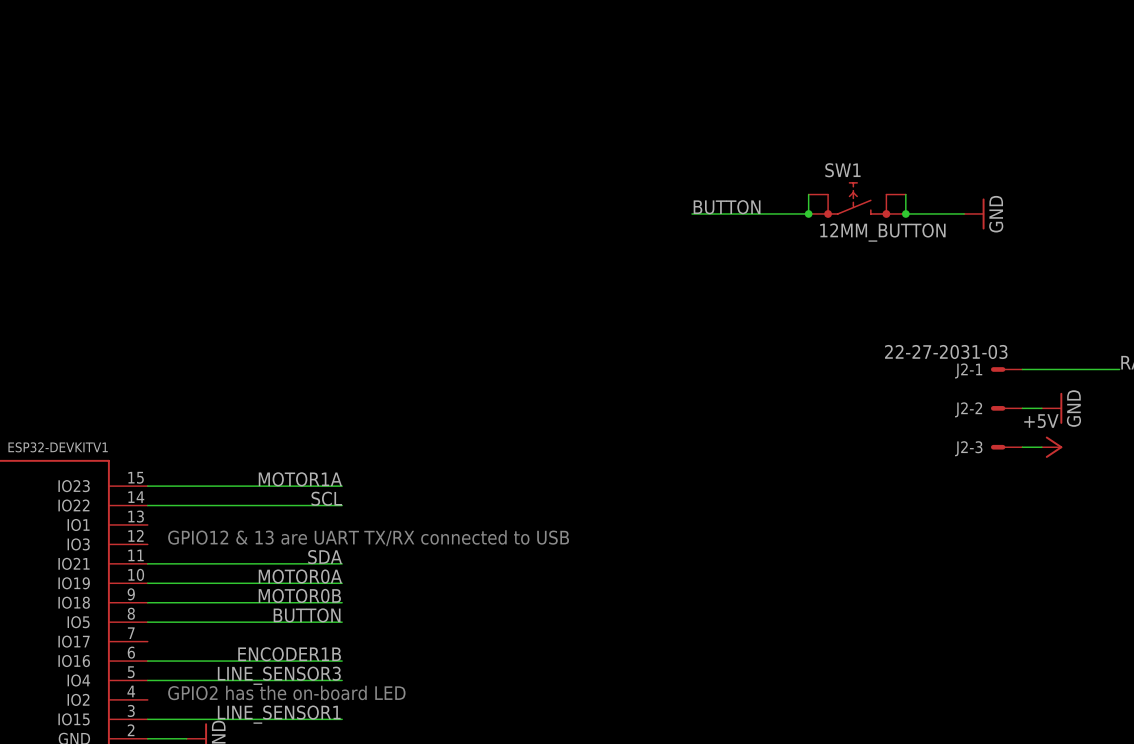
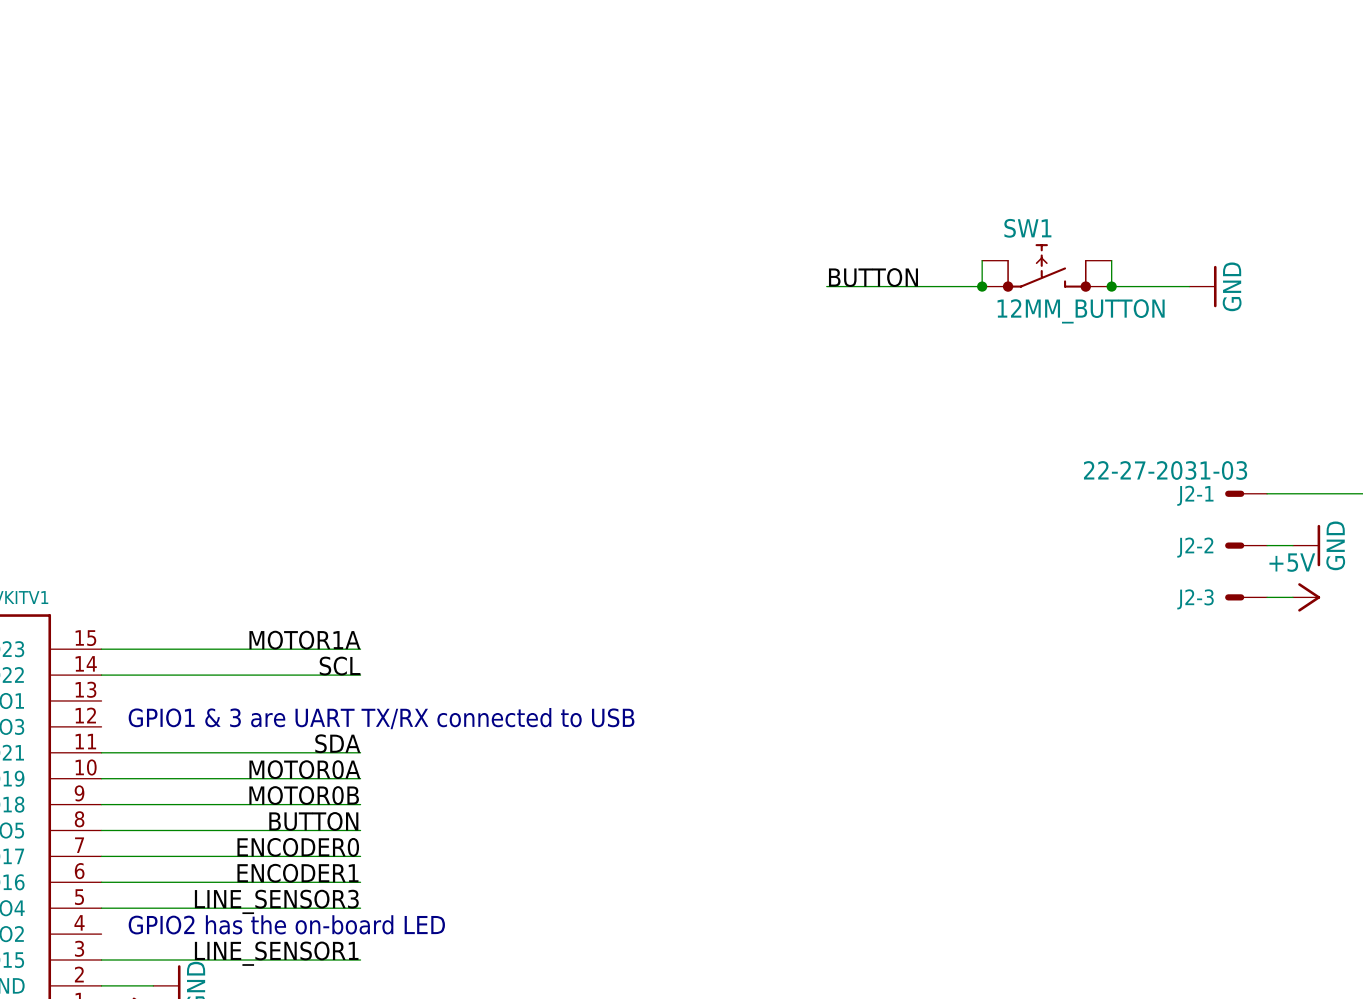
text: GPIO12 & 13 are UART TX/RX connected to USB (368, 538) -> GPIO1 & 3 are UART TX/RX connected to USB (381, 718)
label: none -> ENCODER0 (298, 847)
wire: none -> (101, 856) (360, 856)
label: ENCODER1B (289, 654) -> ENCODER1 (297, 873)

